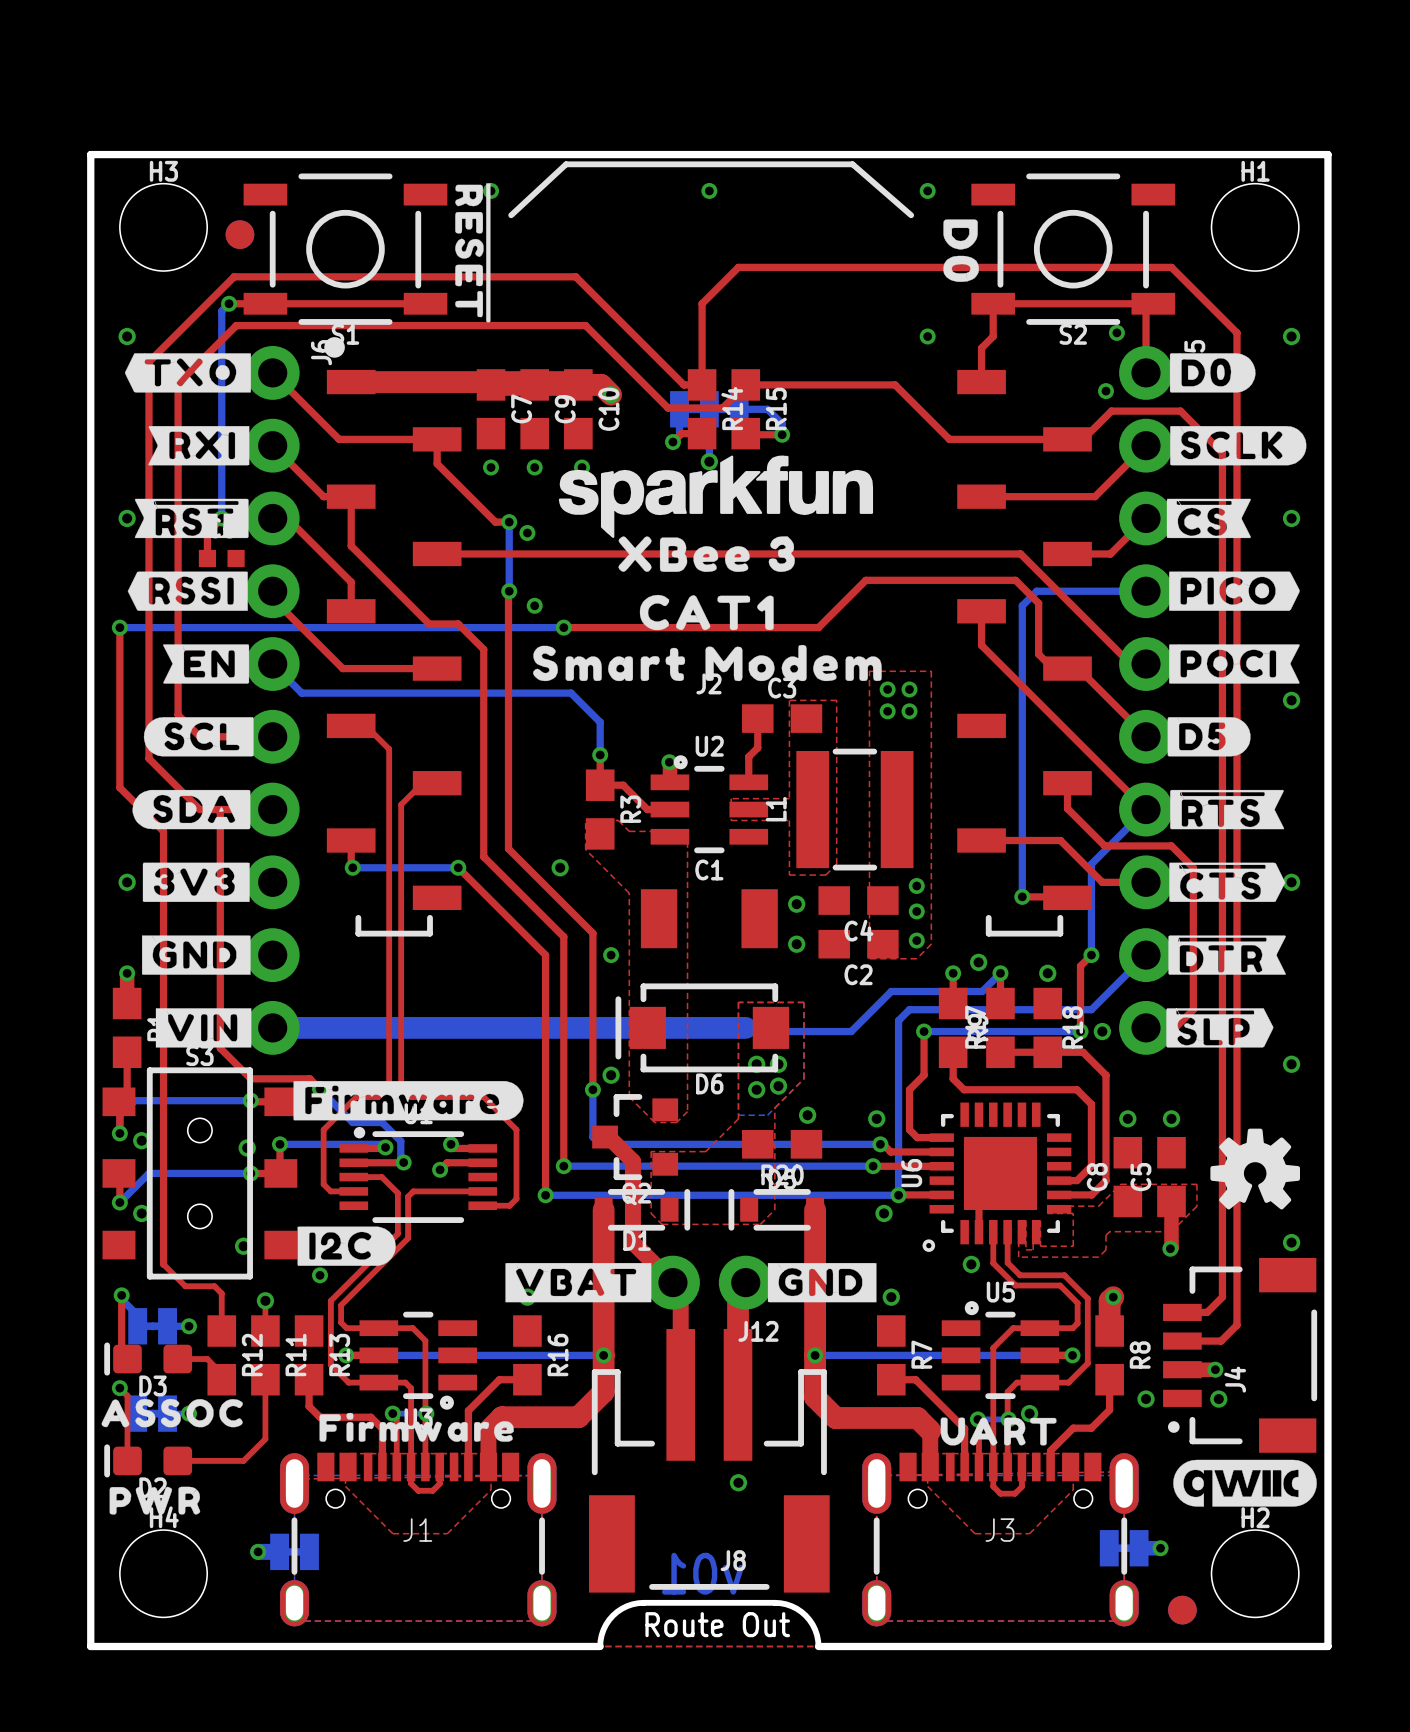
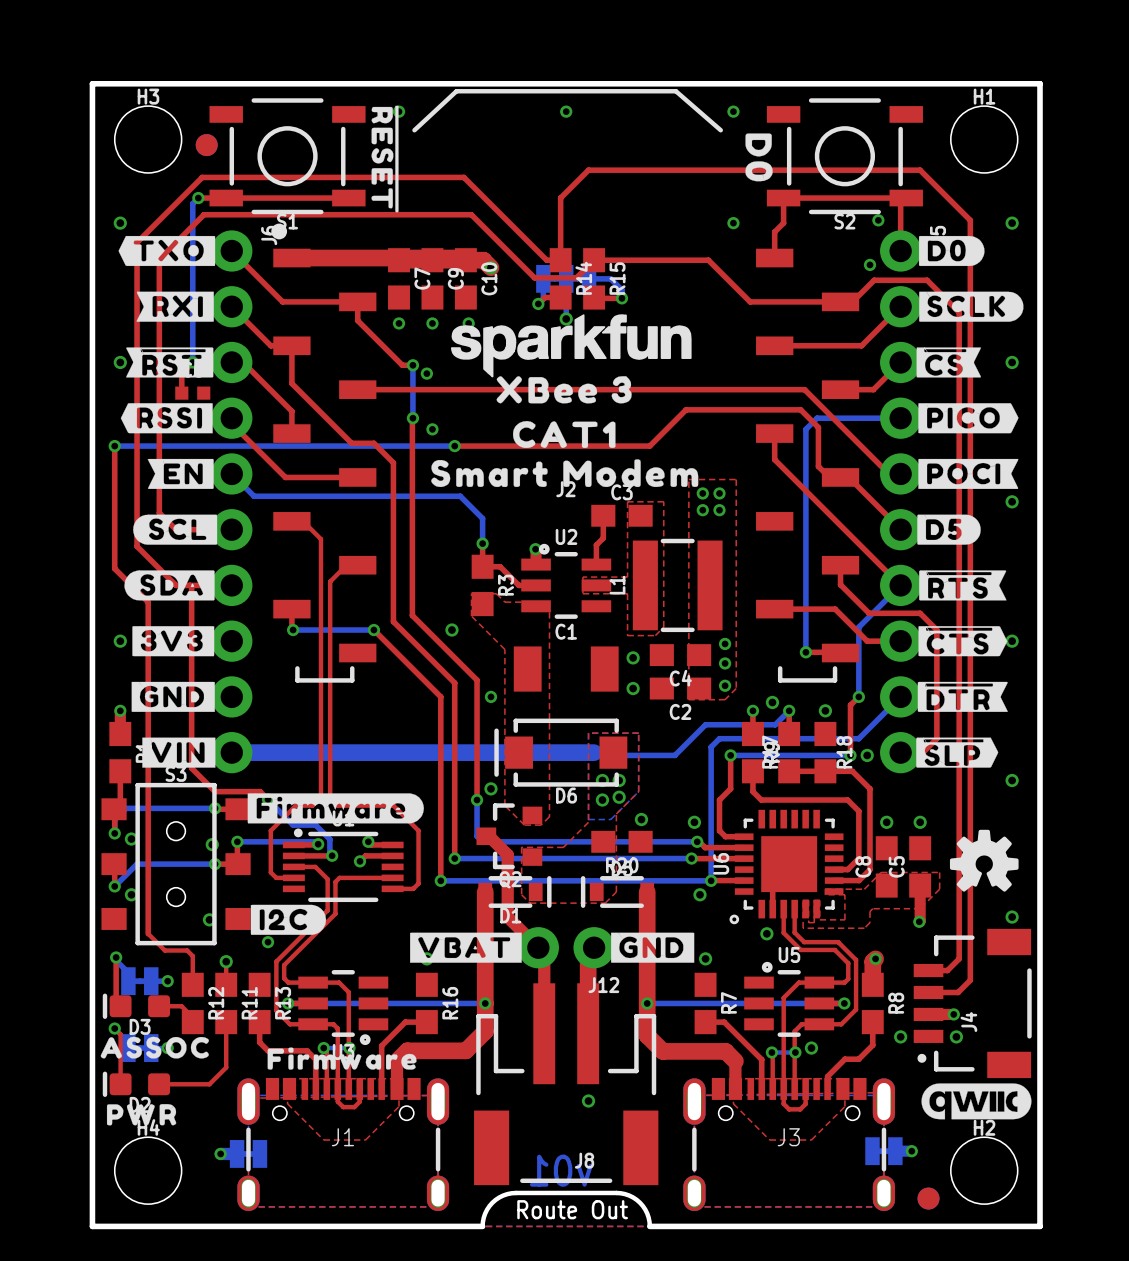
drawing: [940, 1417, 1057, 1446] -> none

